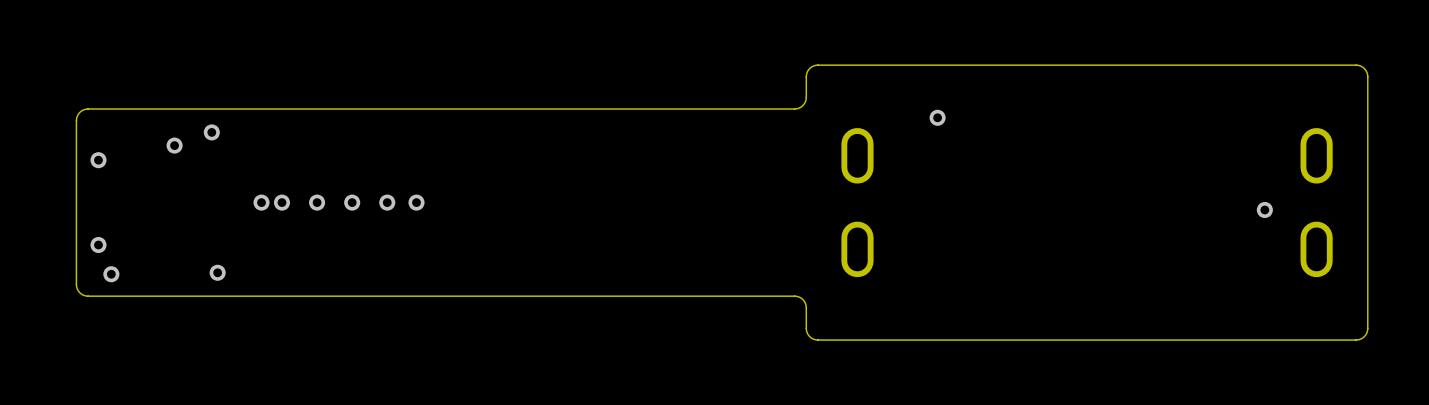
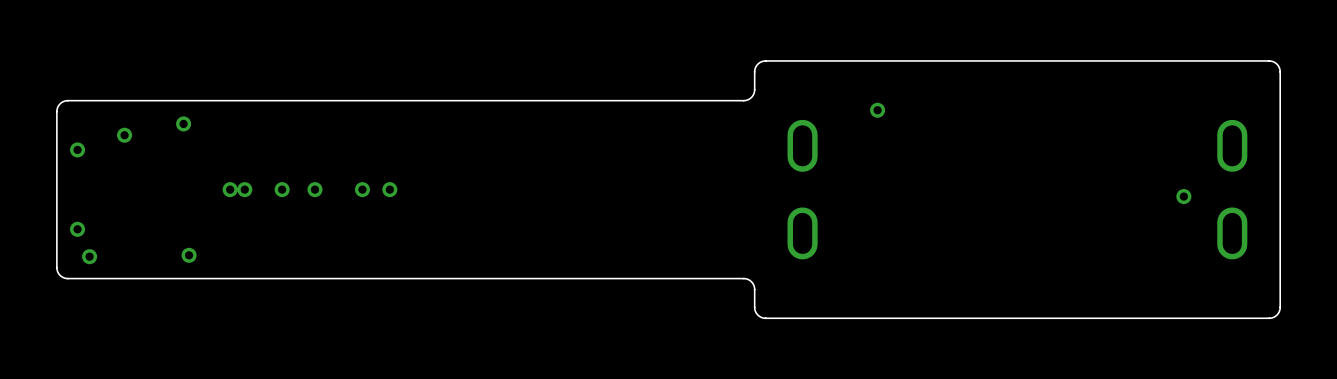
board edge: (806, 95) (802, 105) (794, 109) (88, 109) (79, 112) (76, 120) (76, 284) (78, 291) (85, 295) (794, 296) (803, 300) (806, 309) -> (754, 89) (751, 97) (743, 100) (67, 100) (60, 103) (56, 111) (56, 267) (59, 274) (65, 278) (743, 278) (751, 281) (754, 289)
via position: (211, 132) -> (183, 123)
via: none -> (124, 135)
via: (174, 145) -> none
via position: (98, 160) -> (77, 149)
via: none -> (230, 189)
via: (281, 202) -> none
via position: (317, 202) -> (282, 189)
via position: (352, 202) -> (314, 189)
via position: (98, 245) -> (77, 229)
via position: (217, 272) -> (189, 255)
via position: (111, 274) -> (89, 256)

